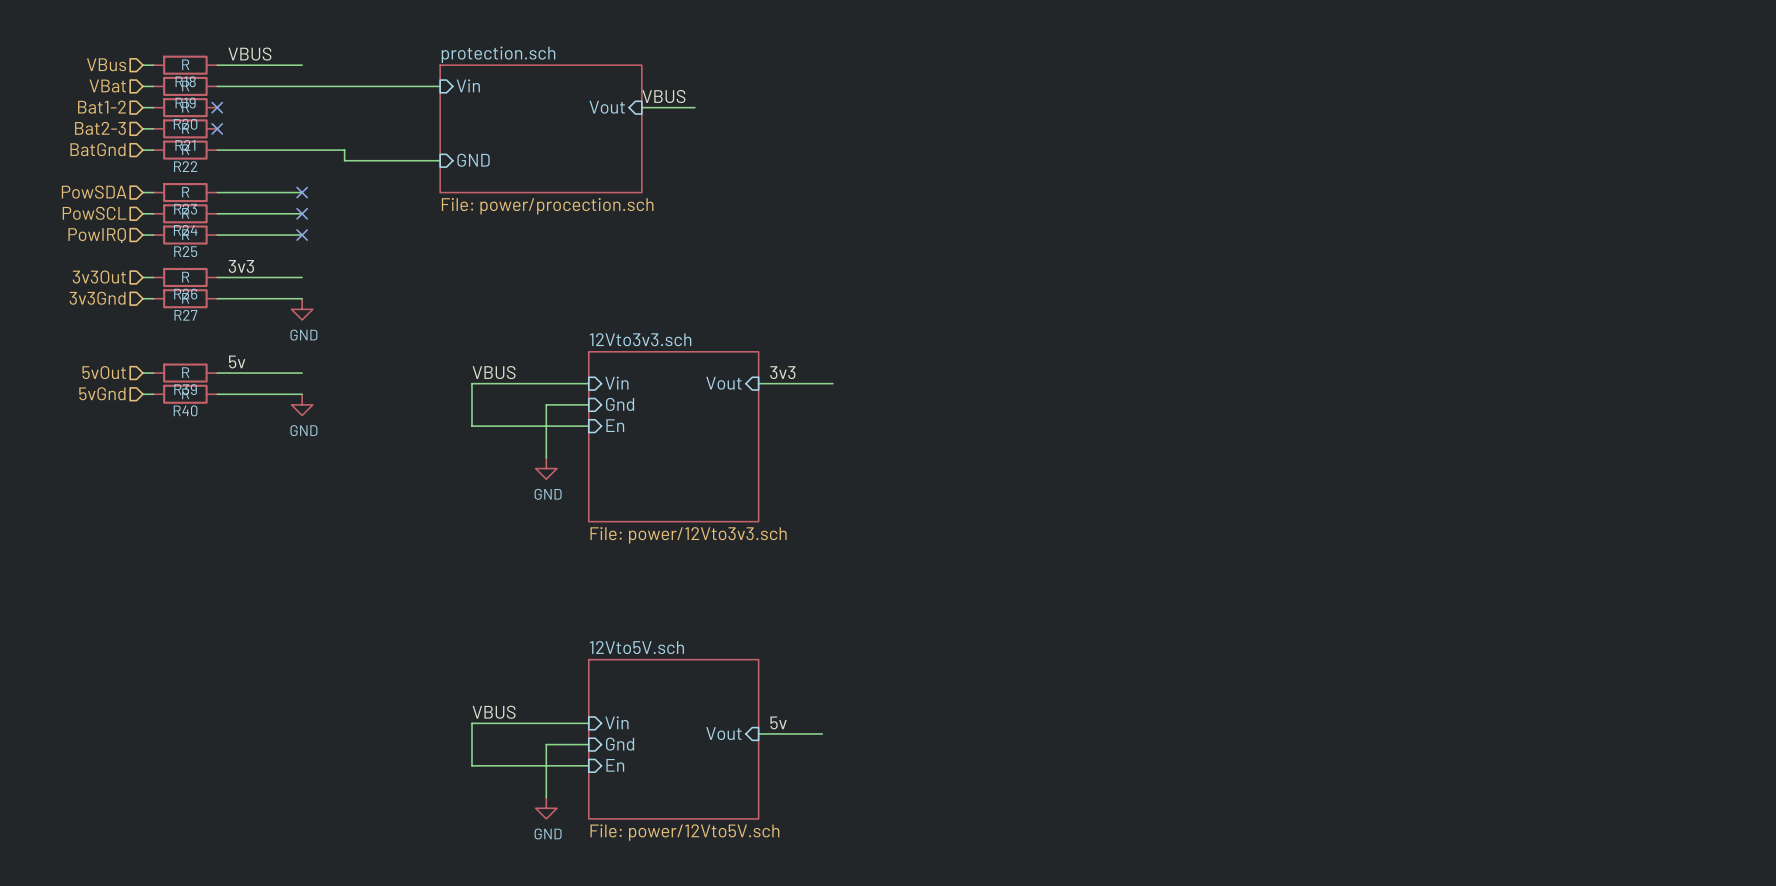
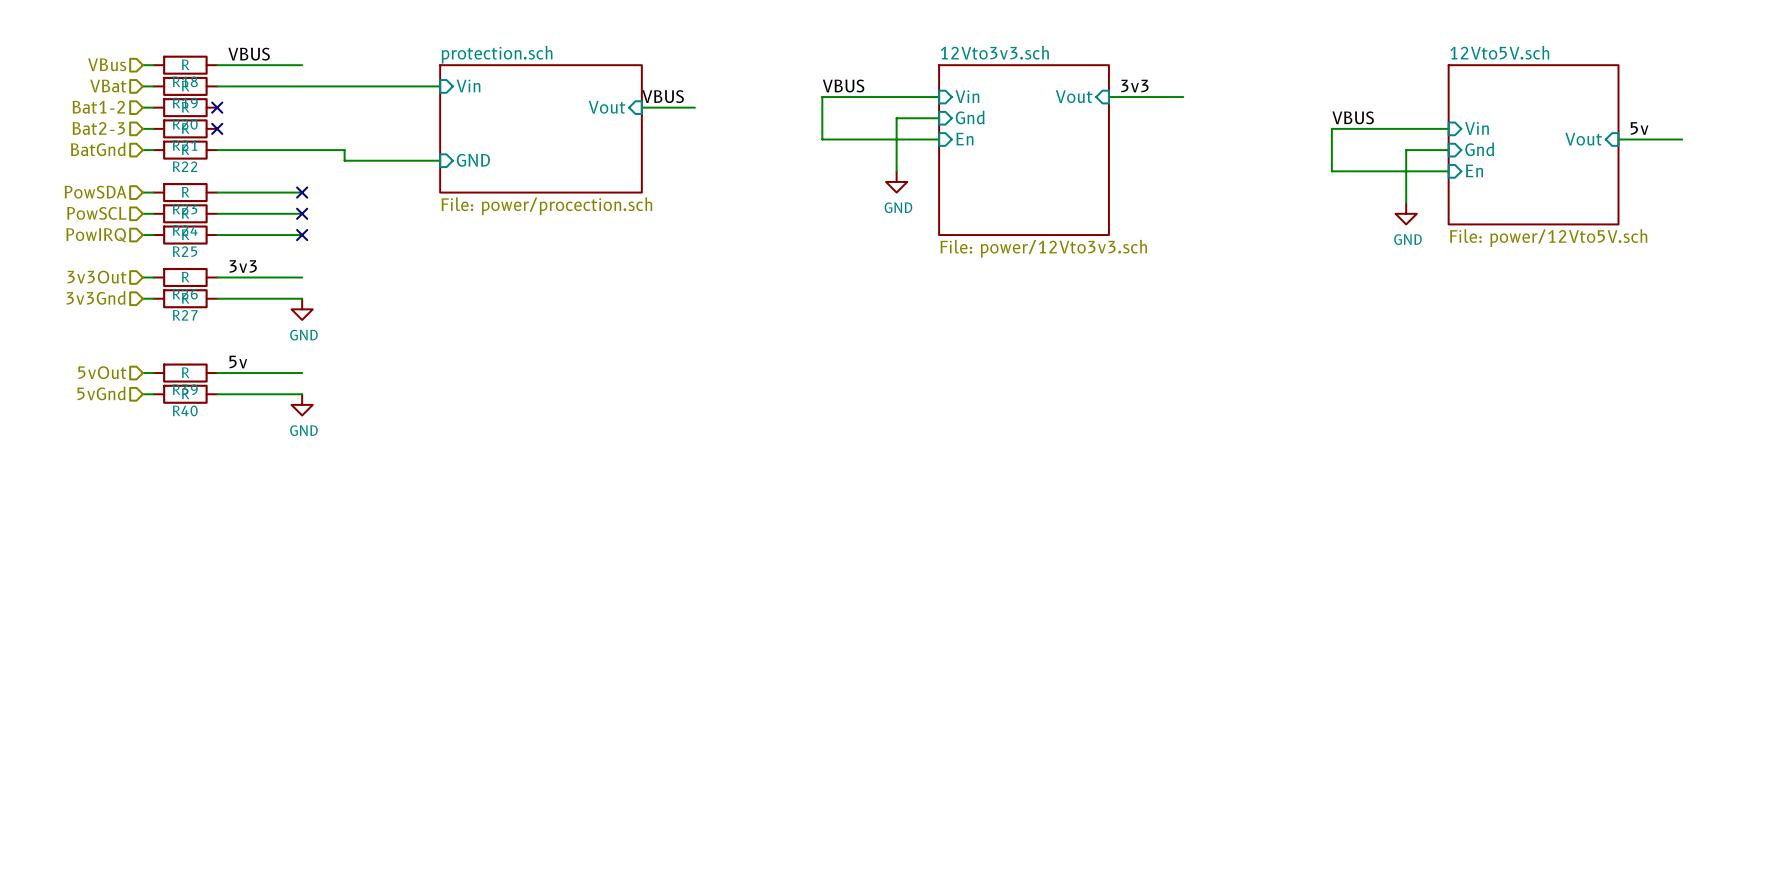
label: none -> VBUS (843, 86)
label: none -> 3v3 (1134, 86)
sheet pin: none -> Vin (967, 96)
sheet pin: none -> Vout (1074, 96)
wire: none -> (939, 97) (822, 97) (822, 139) (939, 139)
wire: none -> (1108, 97) (1183, 97)
sheet pin: none -> Gnd (970, 117)
label: none -> VBUS (1353, 117)
wire: none -> (939, 118) (896, 118) (896, 171)
wire: none -> (1448, 128) (1331, 128) (1331, 171) (1448, 171)
sheet pin: none -> Vin (1477, 128)
label: none -> 5v (1639, 128)
sheet pin: none -> En (964, 139)
sheet pin: none -> Vout (1583, 139)
wire: none -> (1618, 139) (1682, 139)
sheet pin: none -> Gnd (1479, 149)
wire: none -> (1448, 150) (1406, 150) (1406, 203)
sheet pin: none -> En (1474, 170)
power symbol: none -> GND (896, 181)
power symbol: none -> GND (1406, 213)
label: VBUS (494, 372) -> none
label: 3v3 (782, 372) -> none
wire: (588, 383) (472, 383) (472, 426) (588, 426) -> none
sheet pin: Vin (616, 383) -> none
sheet pin: Vout (723, 383) -> none
wire: (758, 383) (832, 383) -> none
wire: (588, 404) (546, 404) (546, 457) -> none
sheet pin: Gnd (620, 404) -> none
sheet pin: En (615, 425) -> none
sheet 12Vto3v3.sch position: (673, 436) -> (1024, 150)
power symbol: GND (546, 468) -> none
label: VBUS (494, 712) -> none
sheet pin: Vin (616, 722) -> none
label: 5v (778, 722) -> none
wire: (588, 723) (472, 723) (472, 765) (588, 765) -> none
sheet pin: Vout (723, 733) -> none
wire: (758, 733) (822, 733) -> none
sheet 12Vto5V.sch position: (673, 739) -> (1533, 144)
wire: (588, 744) (546, 744) (546, 797) -> none
sheet pin: Gnd (620, 744) -> none
sheet pin: En (615, 765) -> none
power symbol: GND (546, 808) -> none

